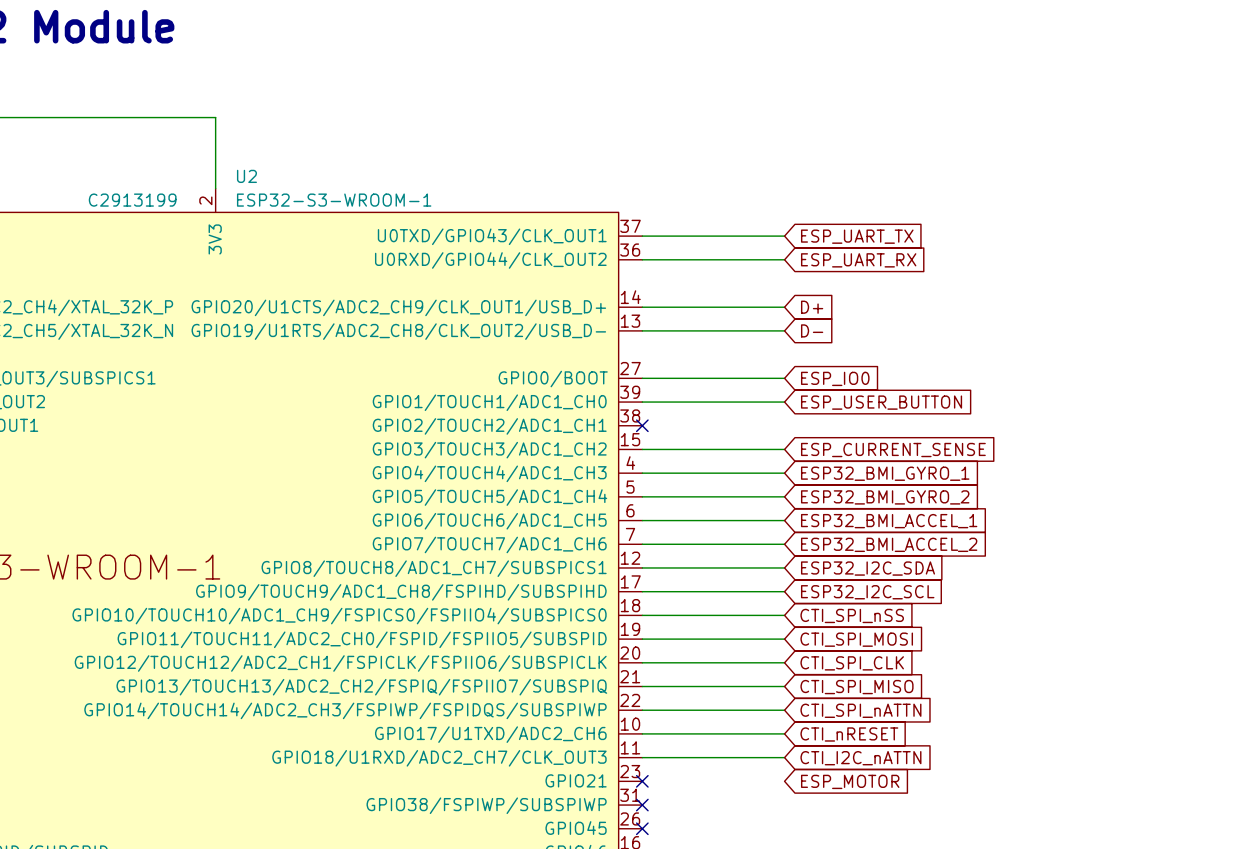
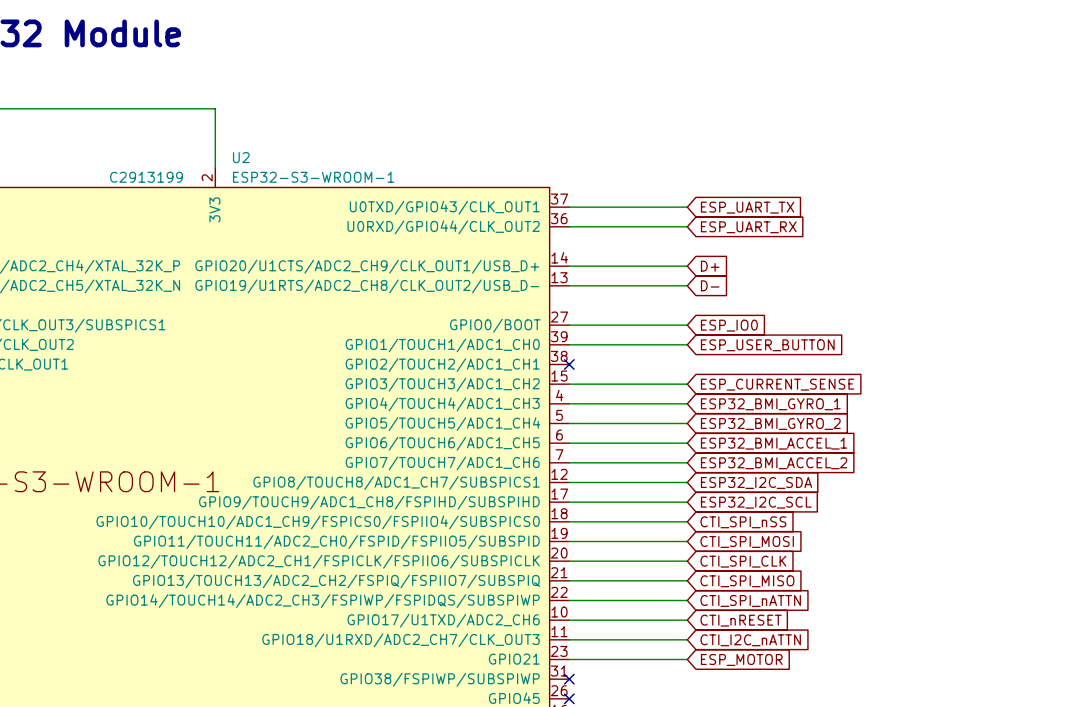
wire: none -> (569, 659) (687, 659)
no-connect mark: (642, 781) -> none

